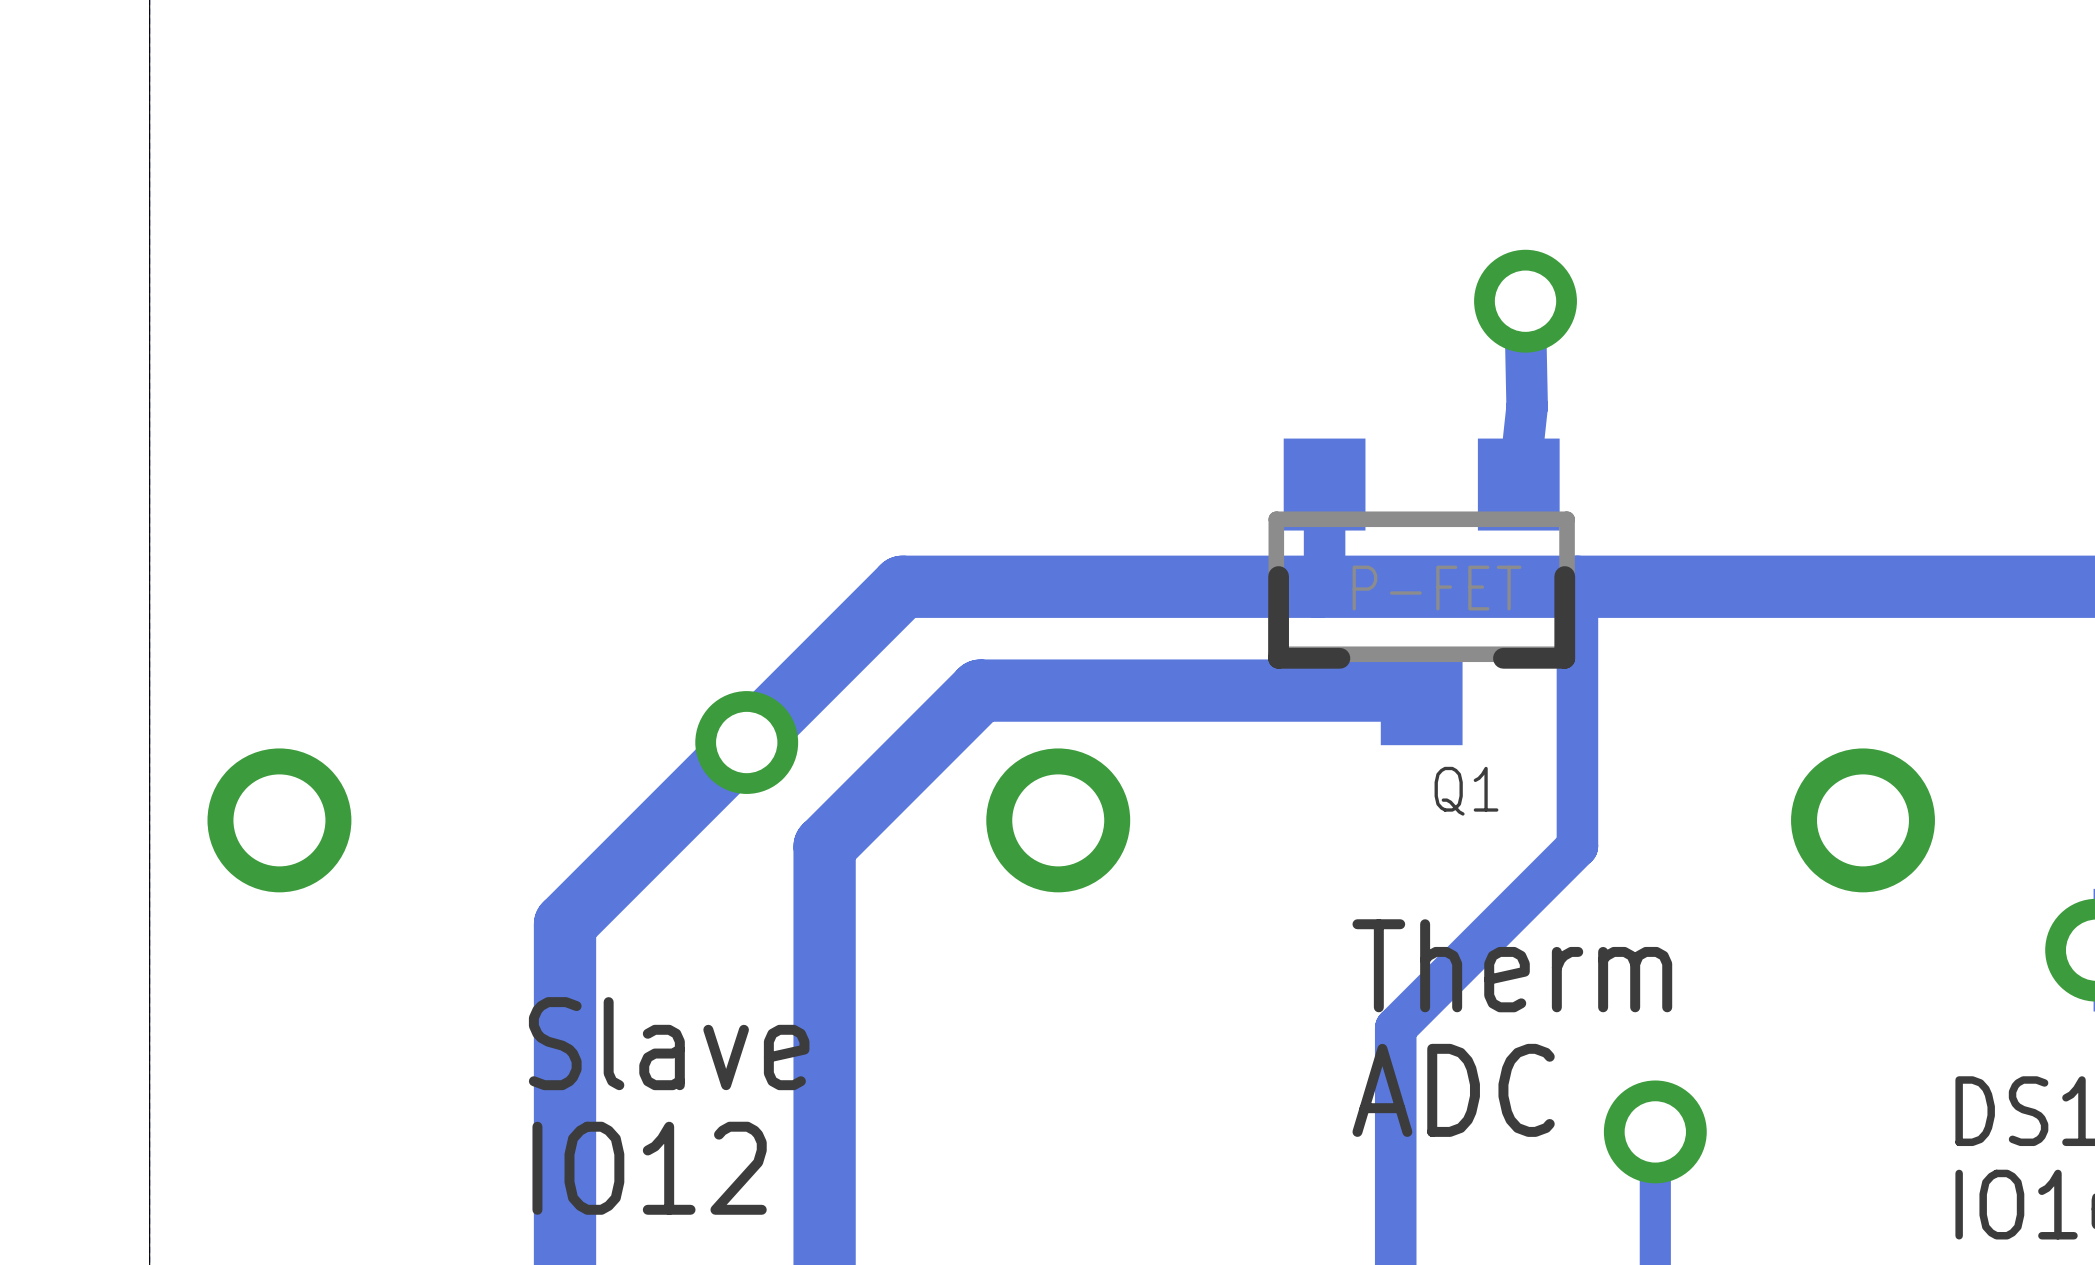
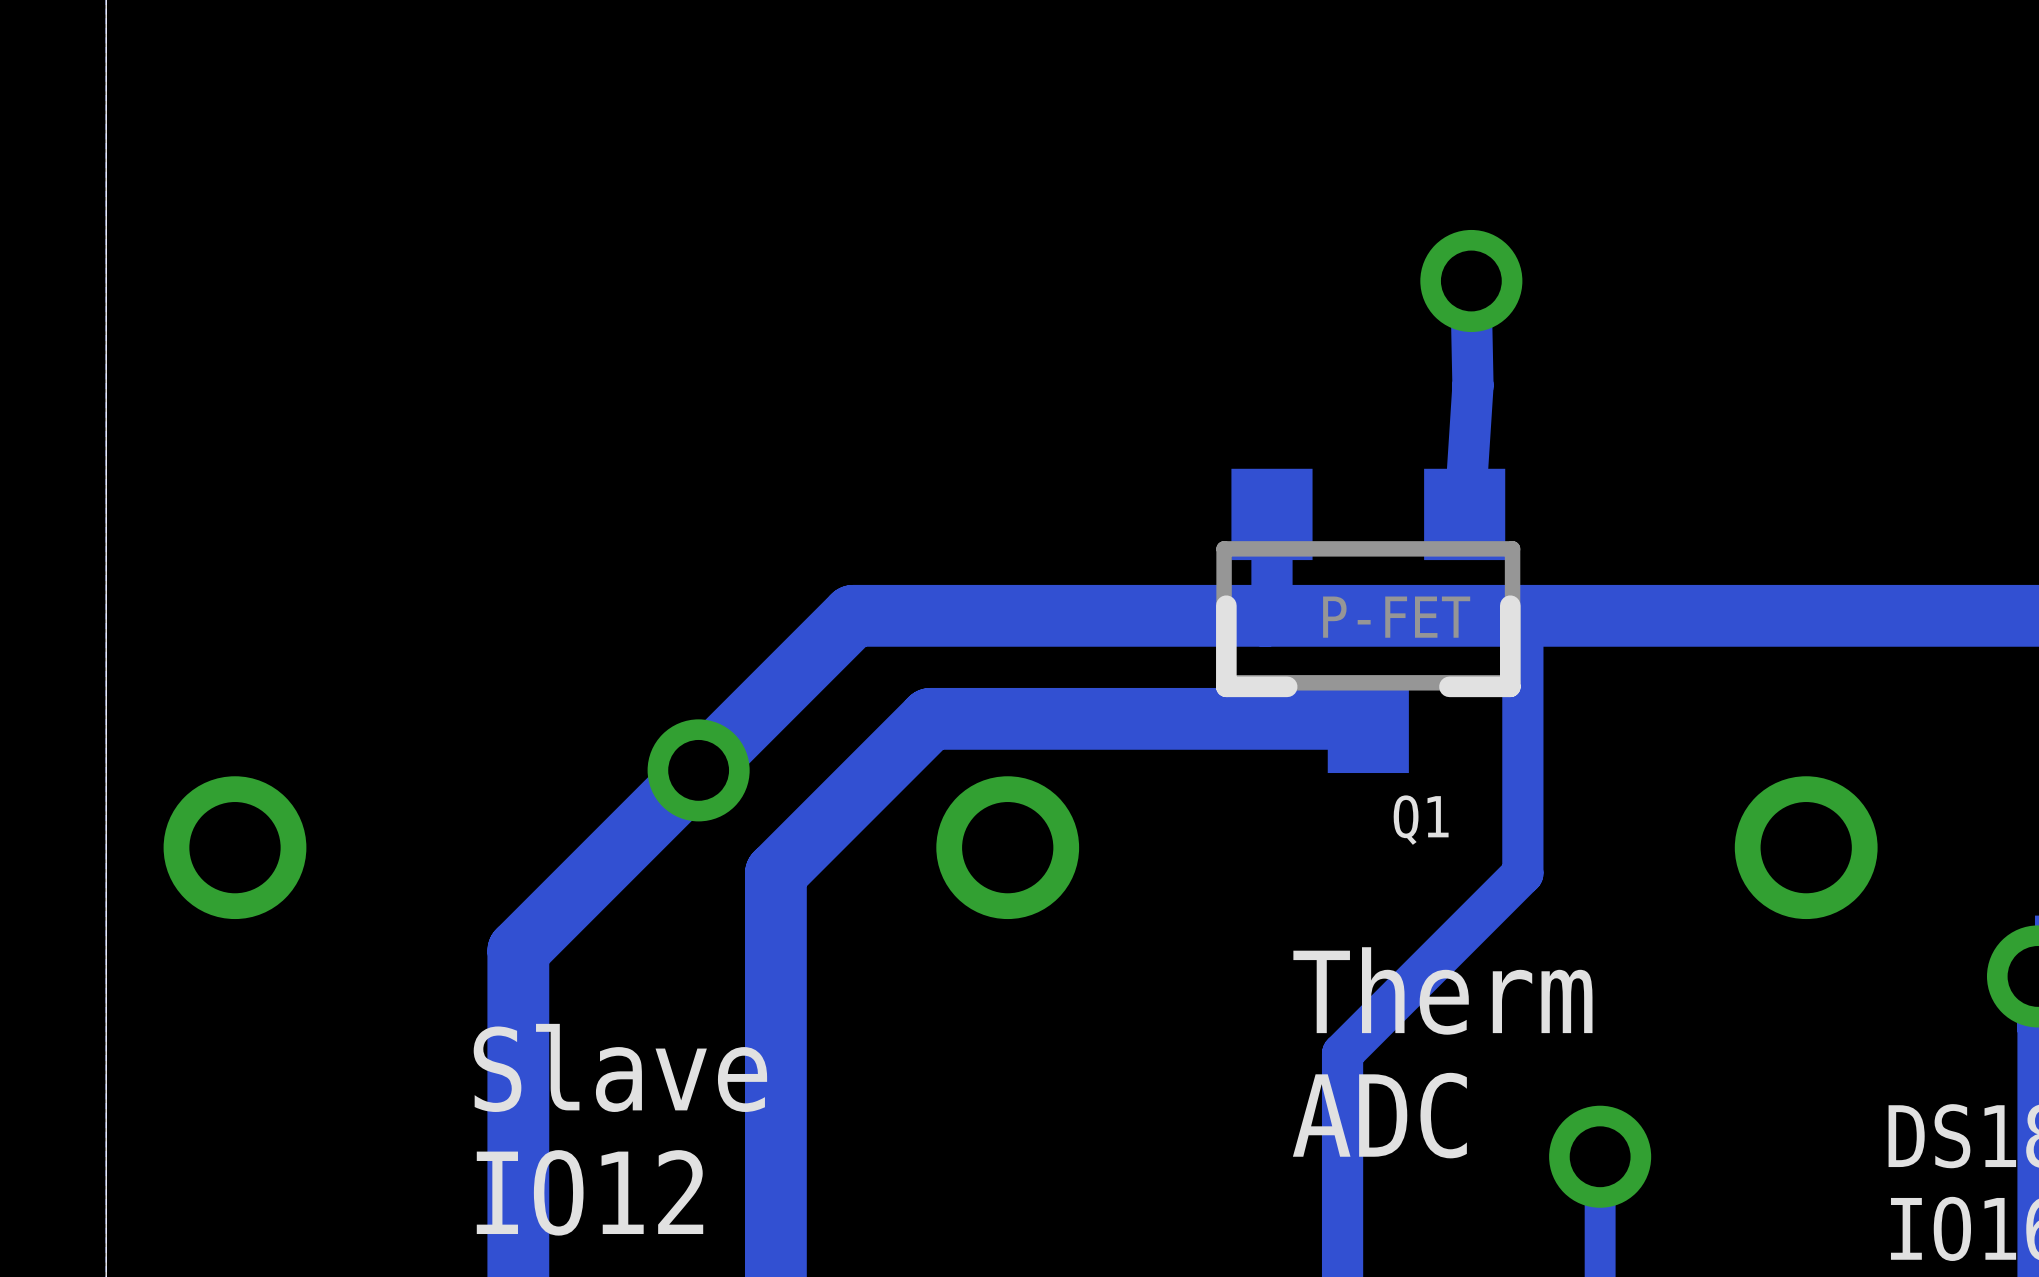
track: (1525, 301) (1527, 406) (1518, 484) -> (1471, 280) (1472, 385) (1464, 514)
via position: (1525, 301) -> (1471, 280)

